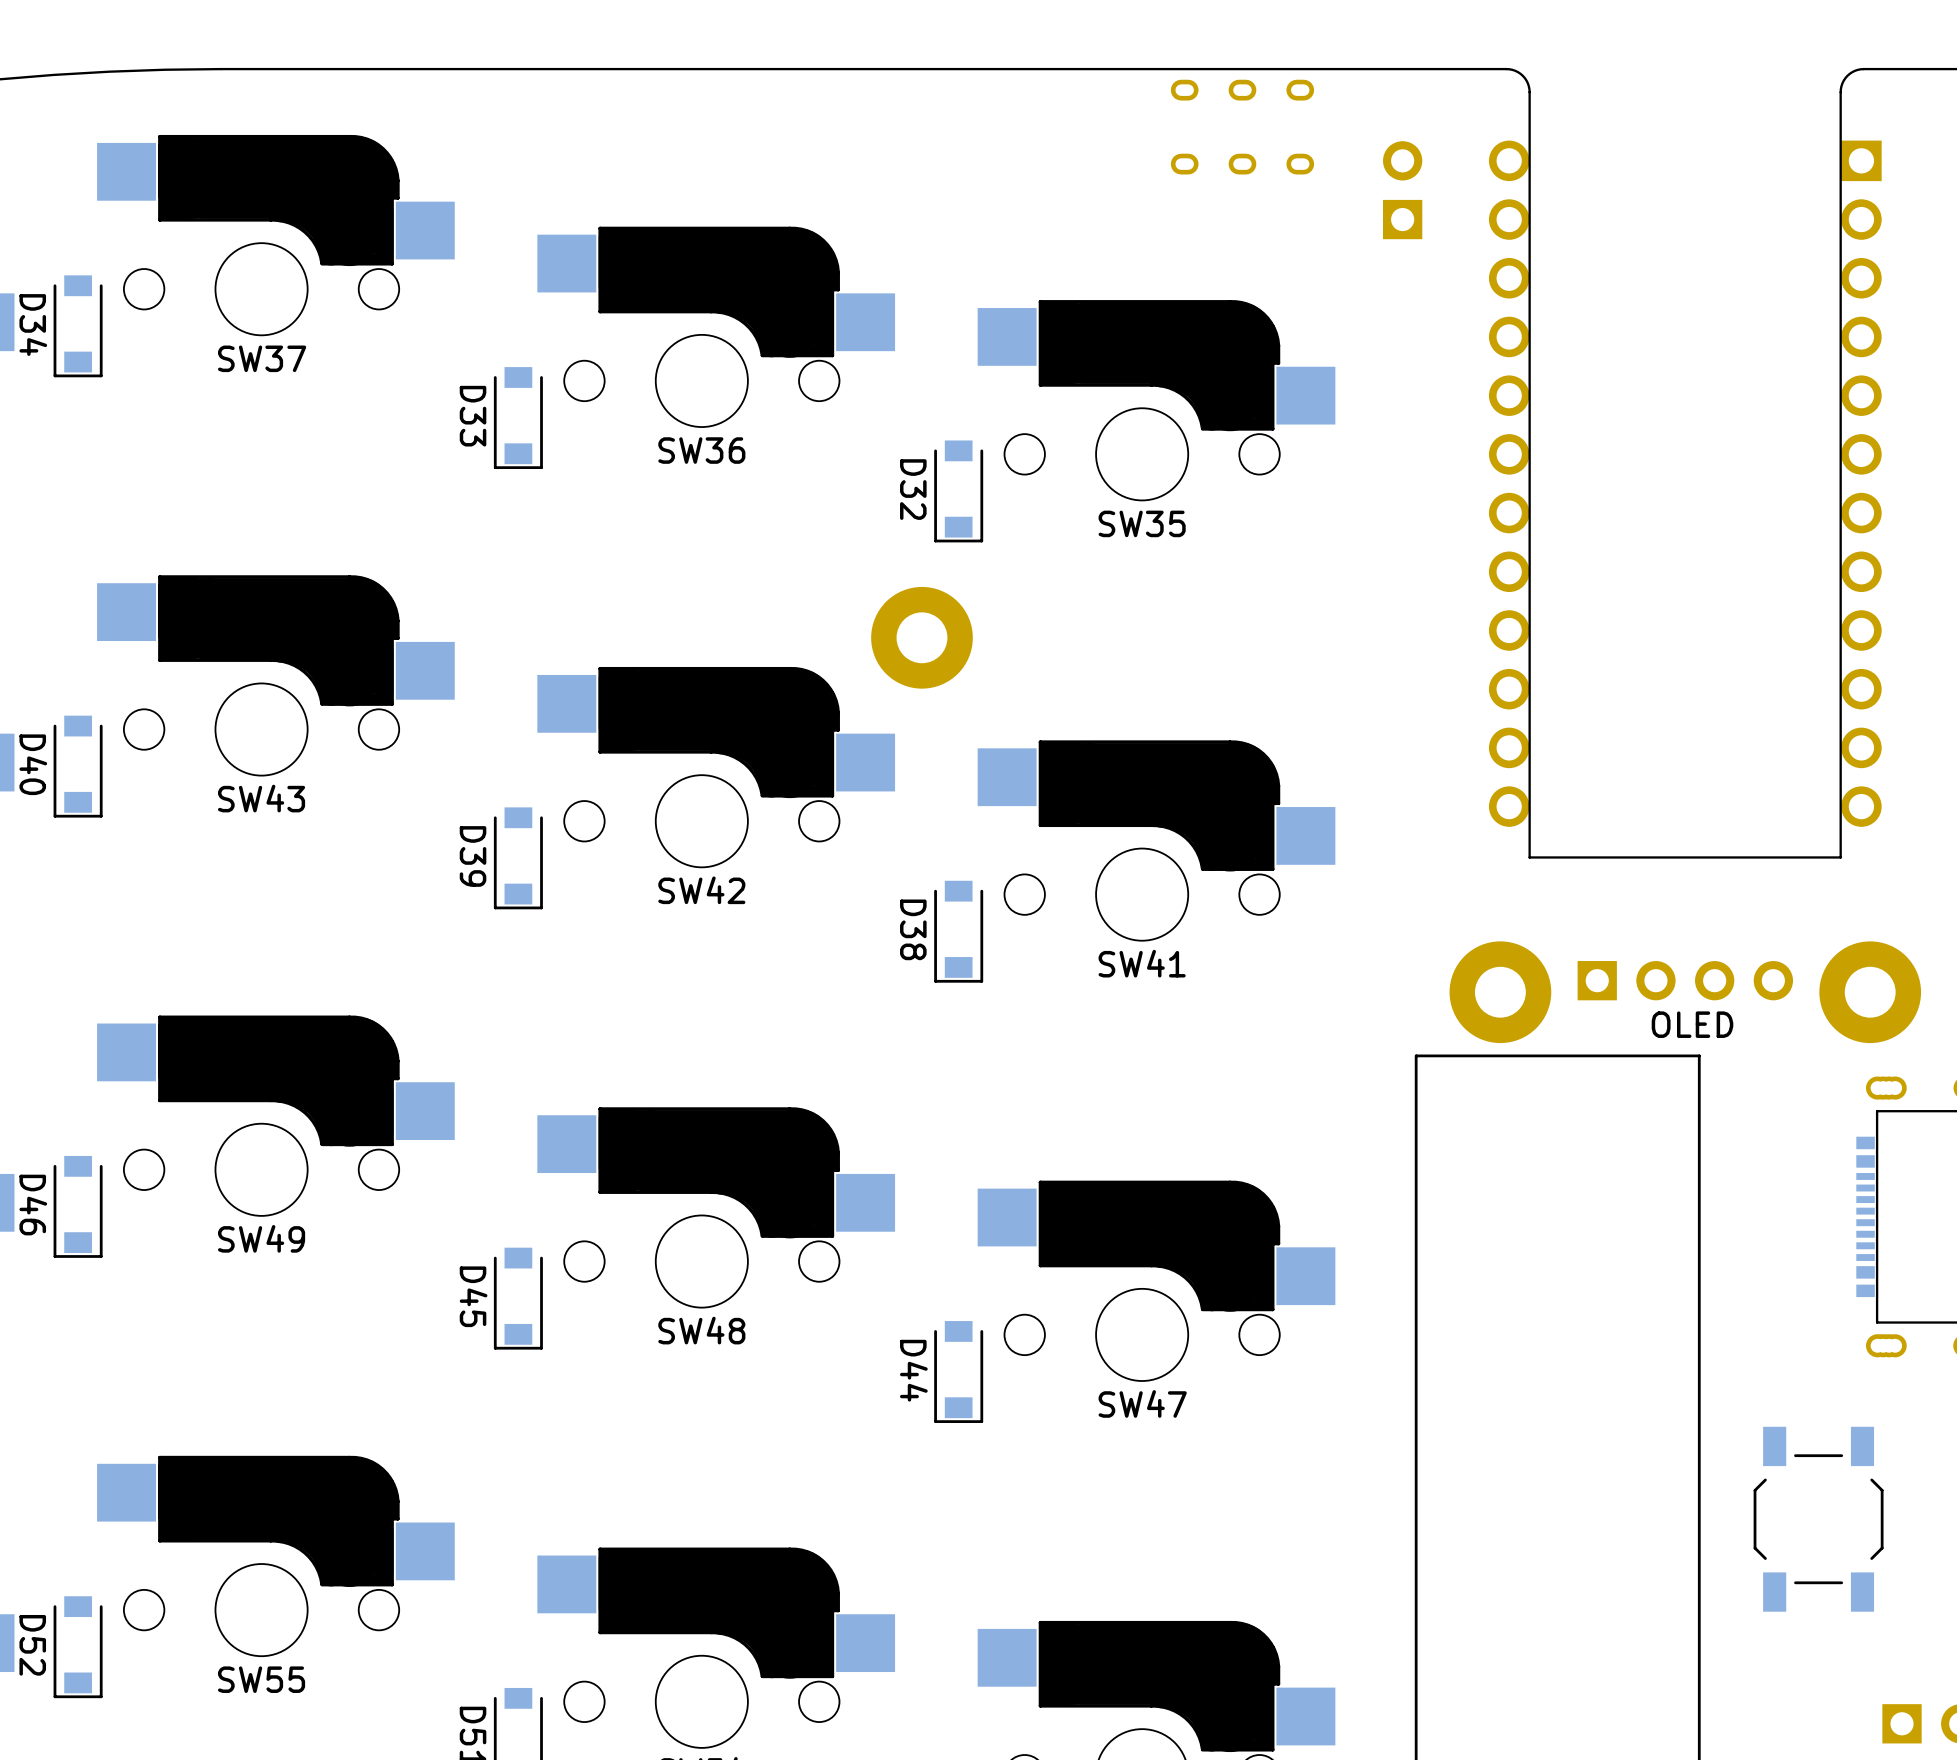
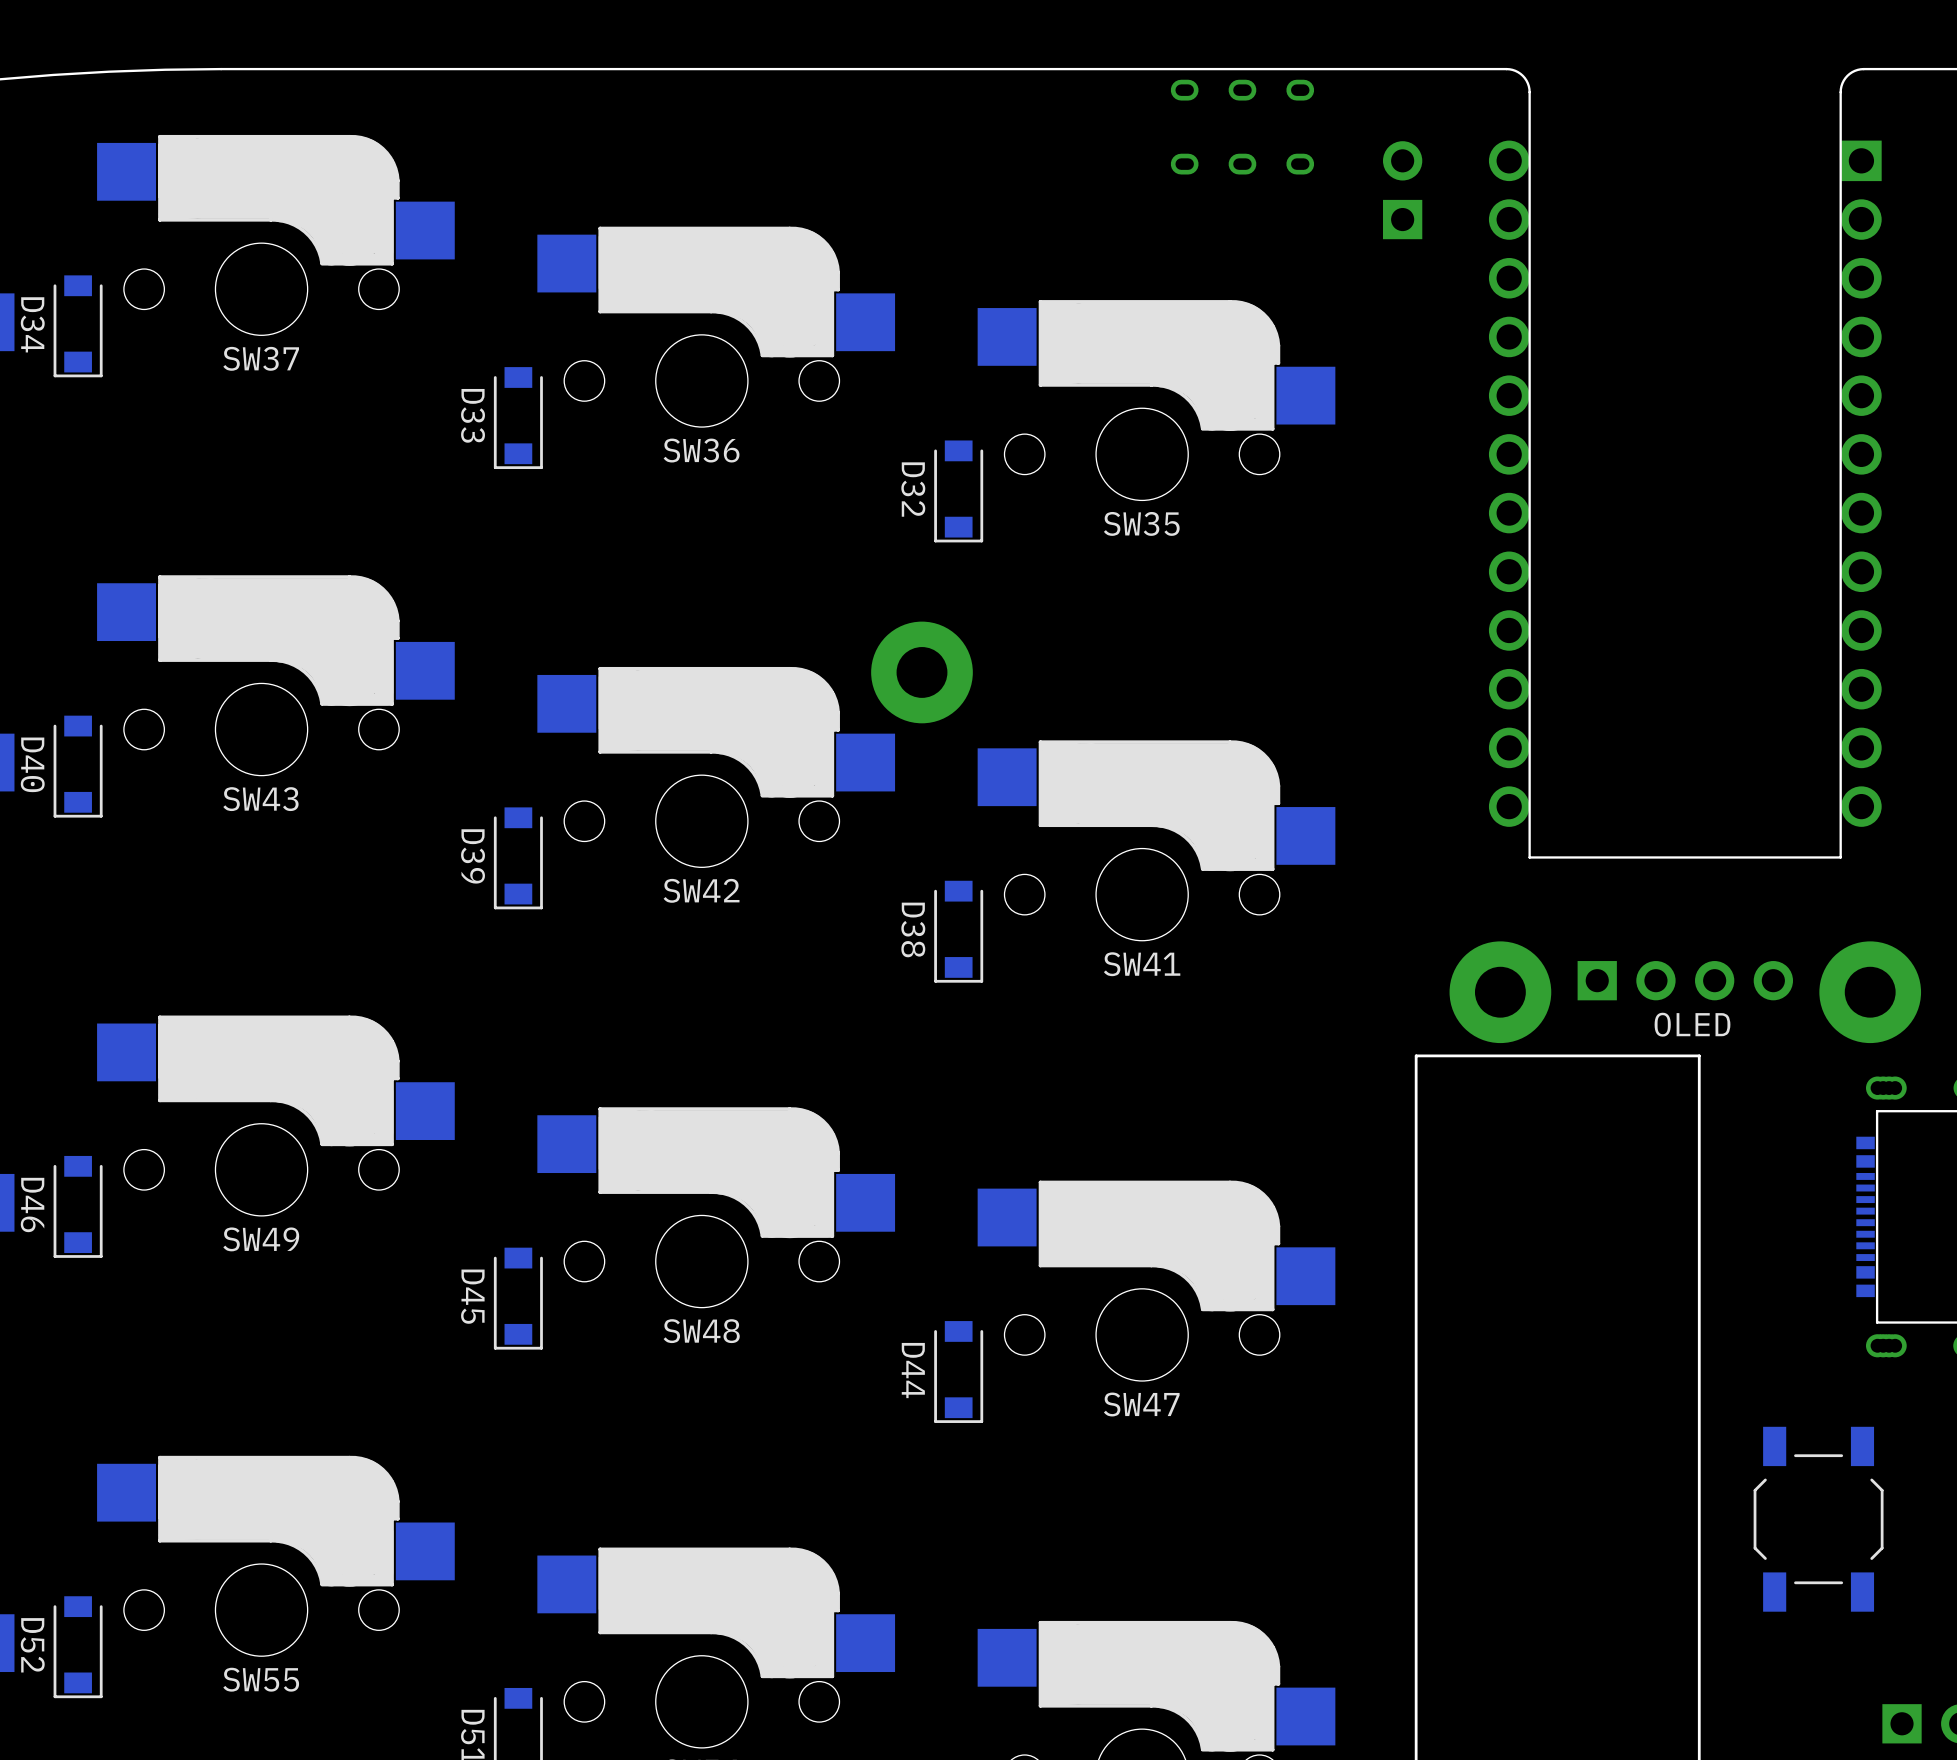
part position: (921, 637) -> (921, 672)

